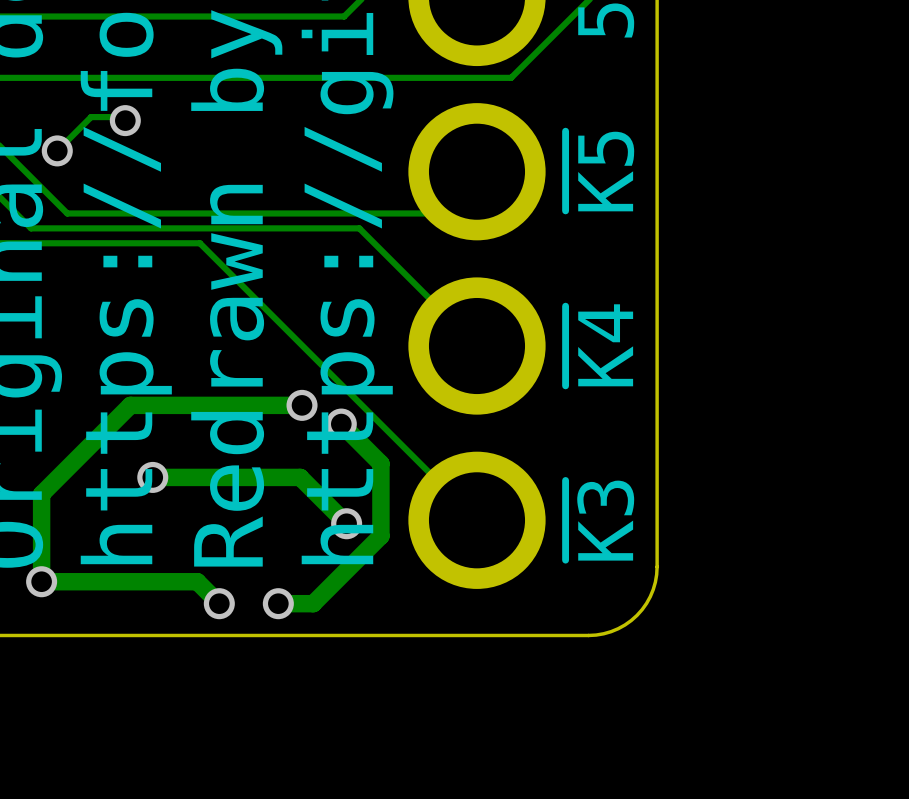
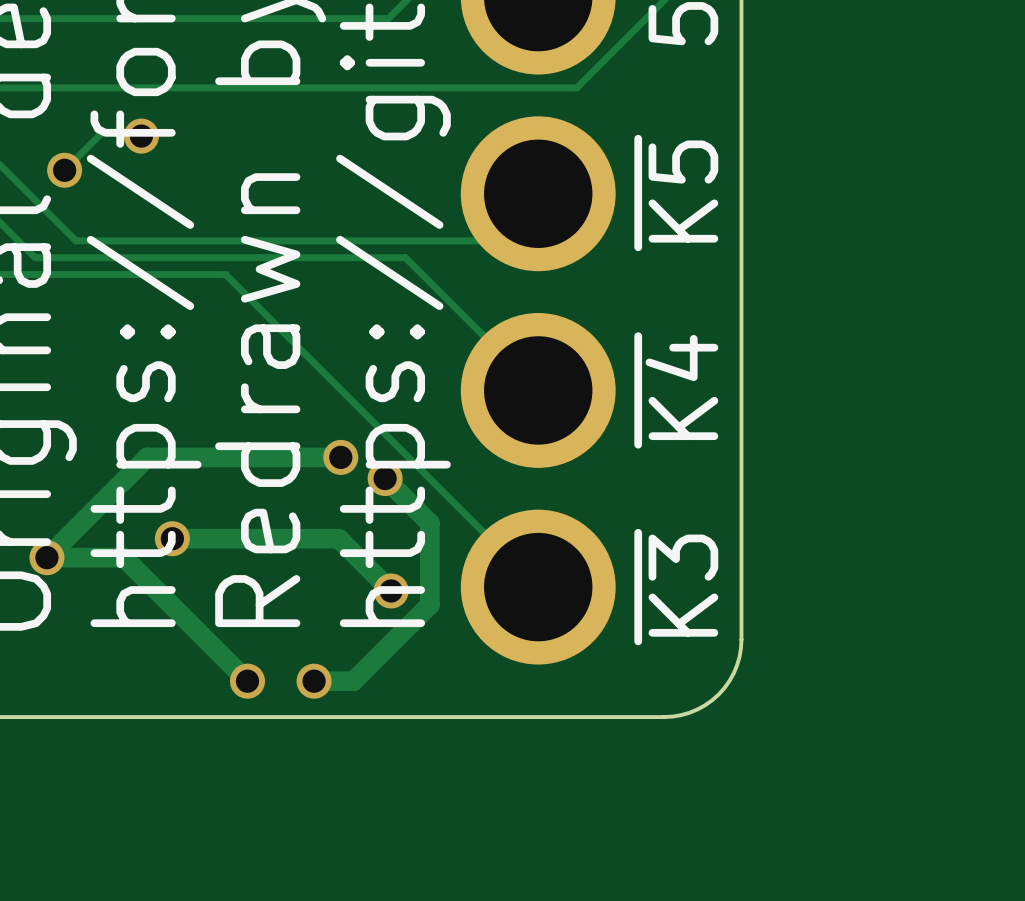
track: (41, 494) (41, 581) (197, 581) -> (46, 557) (123, 557) (222, 656)
via position: (41, 581) -> (46, 557)

